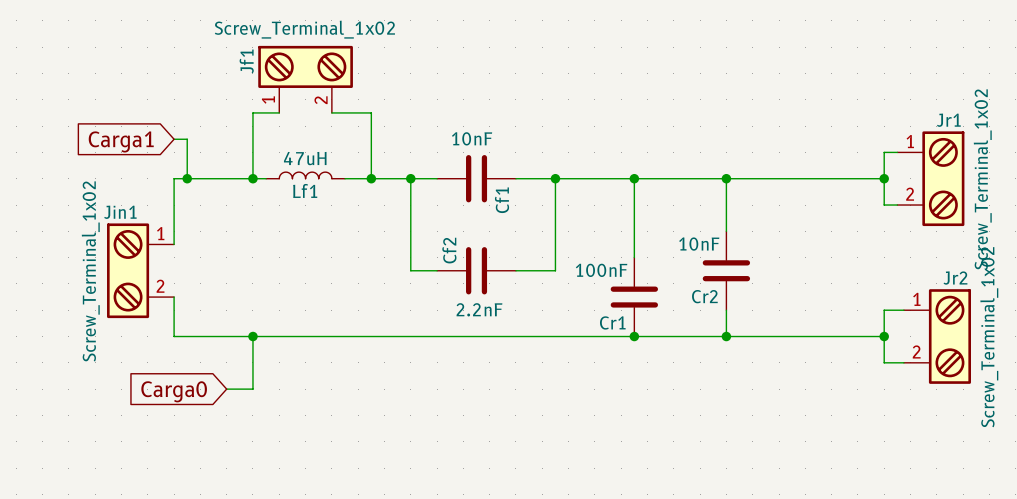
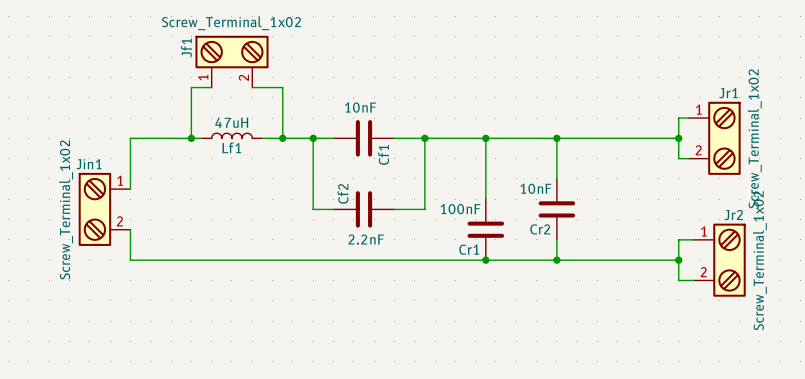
wire: (174, 139) (187, 139) (187, 178) -> none
global label: Carga1 (121, 141) -> none
junction: (187, 178) -> none
wire: (252, 336) (252, 389) (226, 389) -> none
junction: (252, 336) -> none
global label: Carga0 (174, 391) -> none

